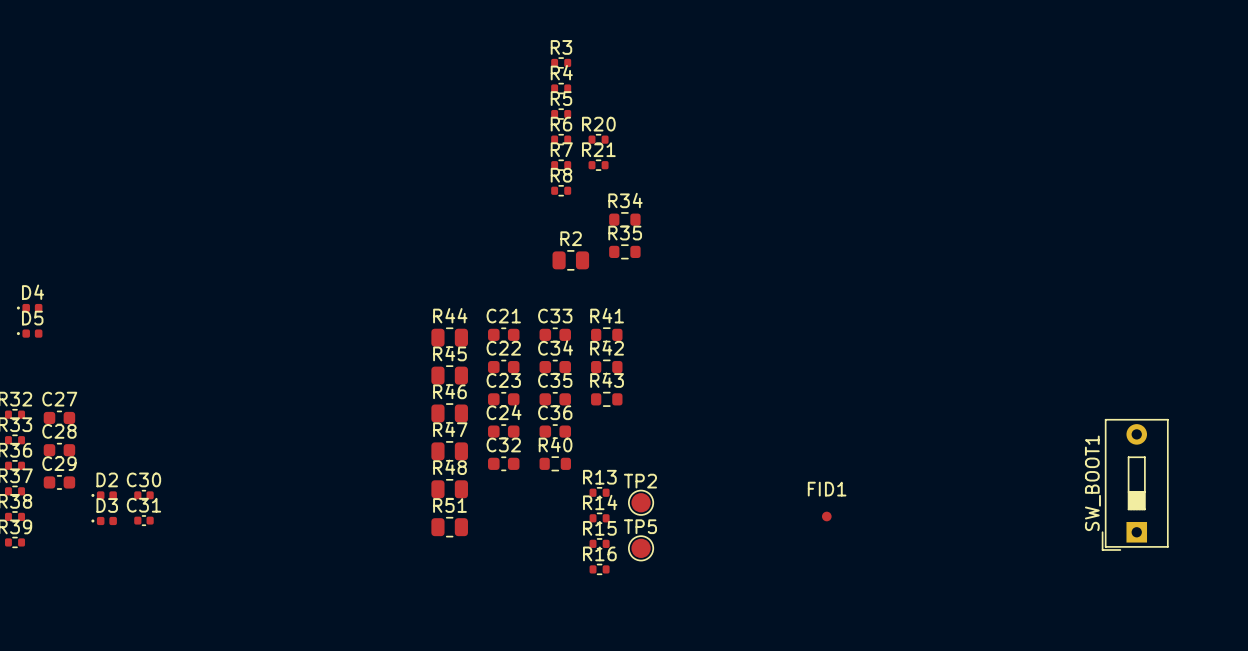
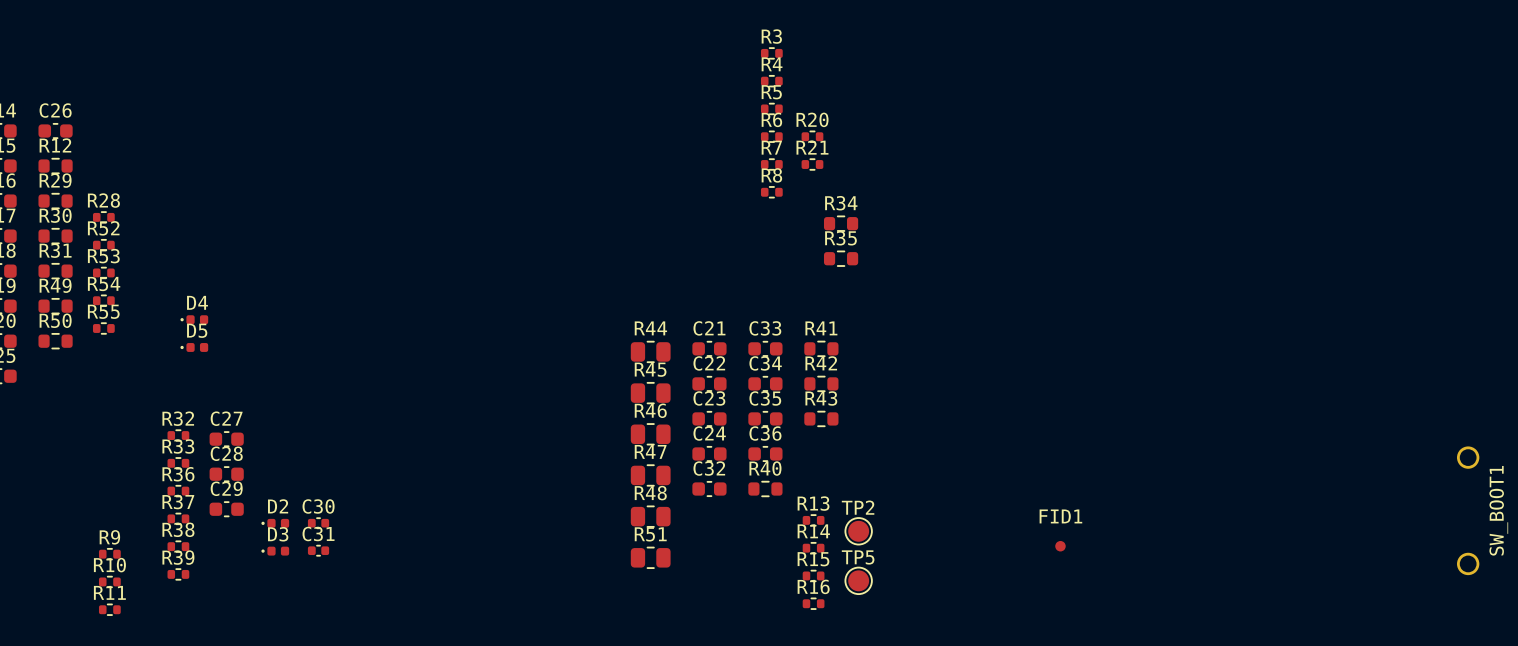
R2: (570, 260) -> none
SW_BOOT1 footprint: [1101, 418, 1169, 551] -> [1457, 446, 1480, 576]
SW_BOOT1 name position: SW_BOOT1 (1092, 483) -> SW_BOOT1 (1498, 510)

